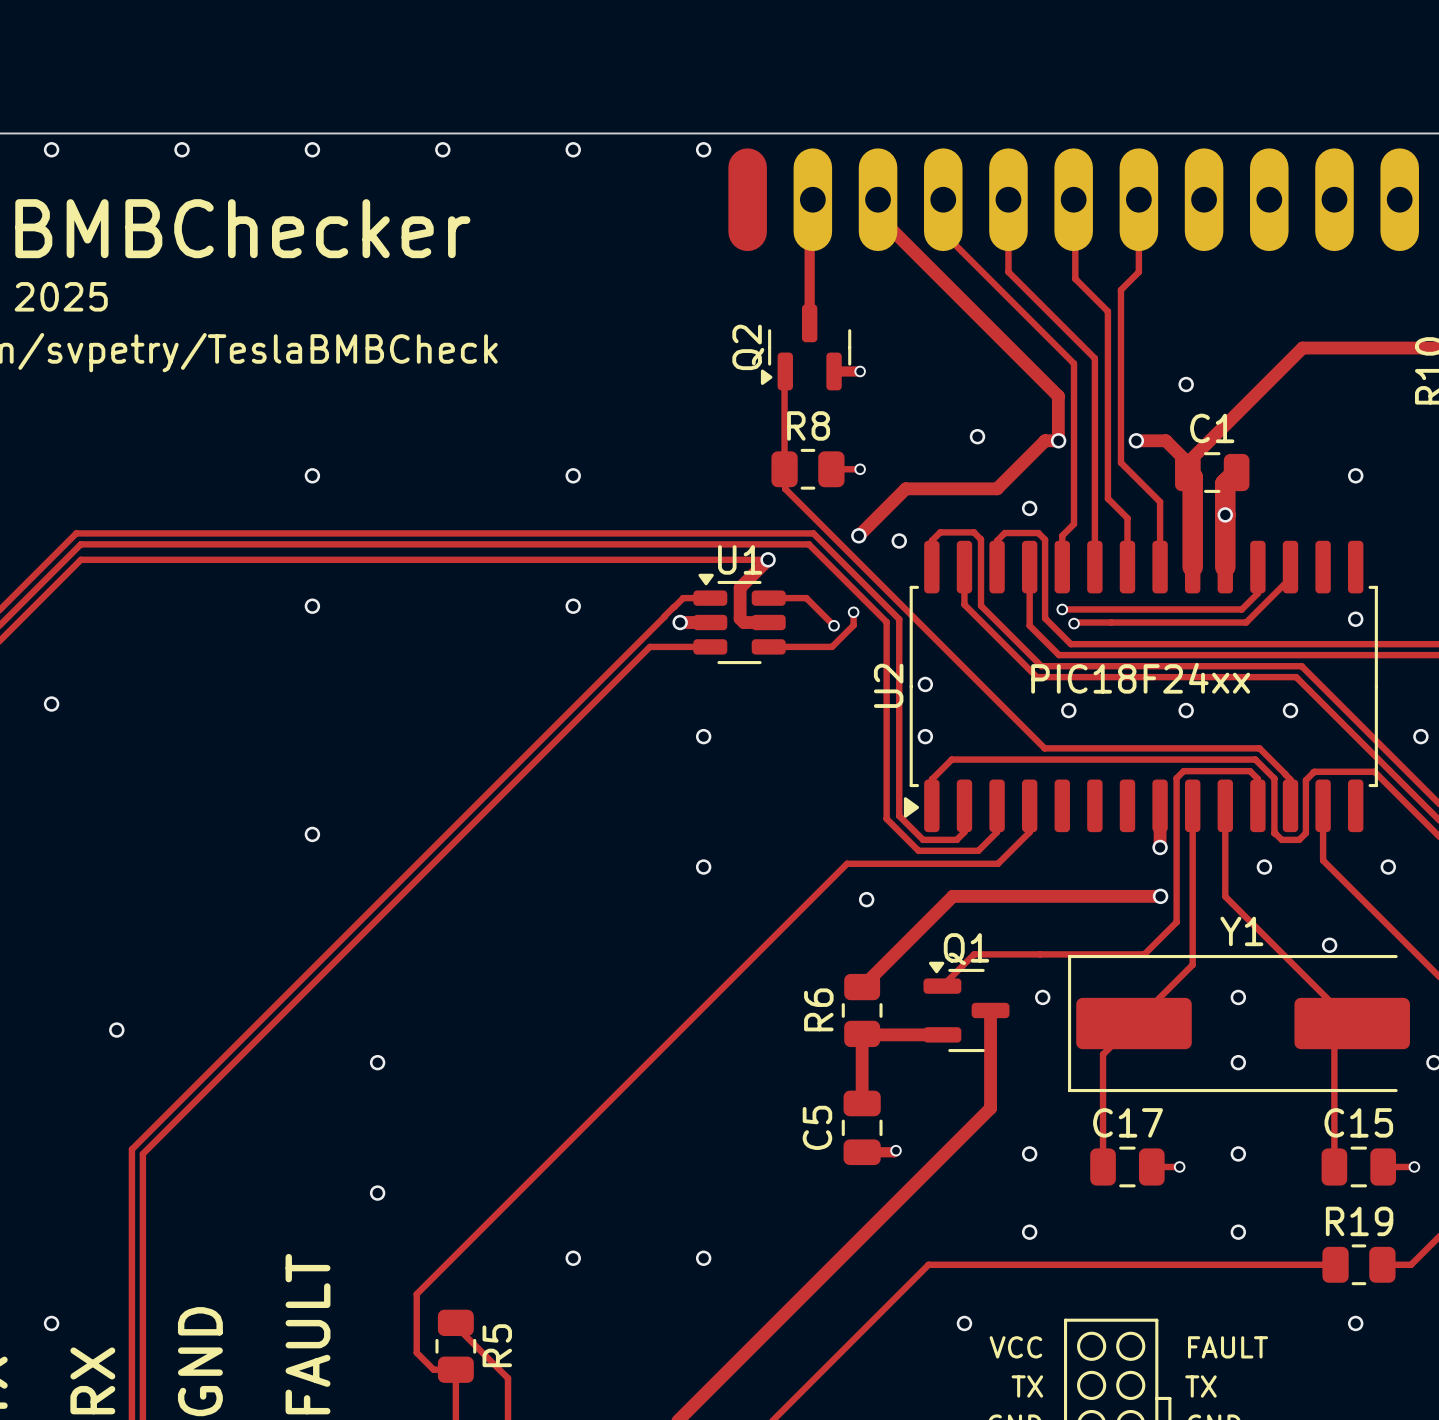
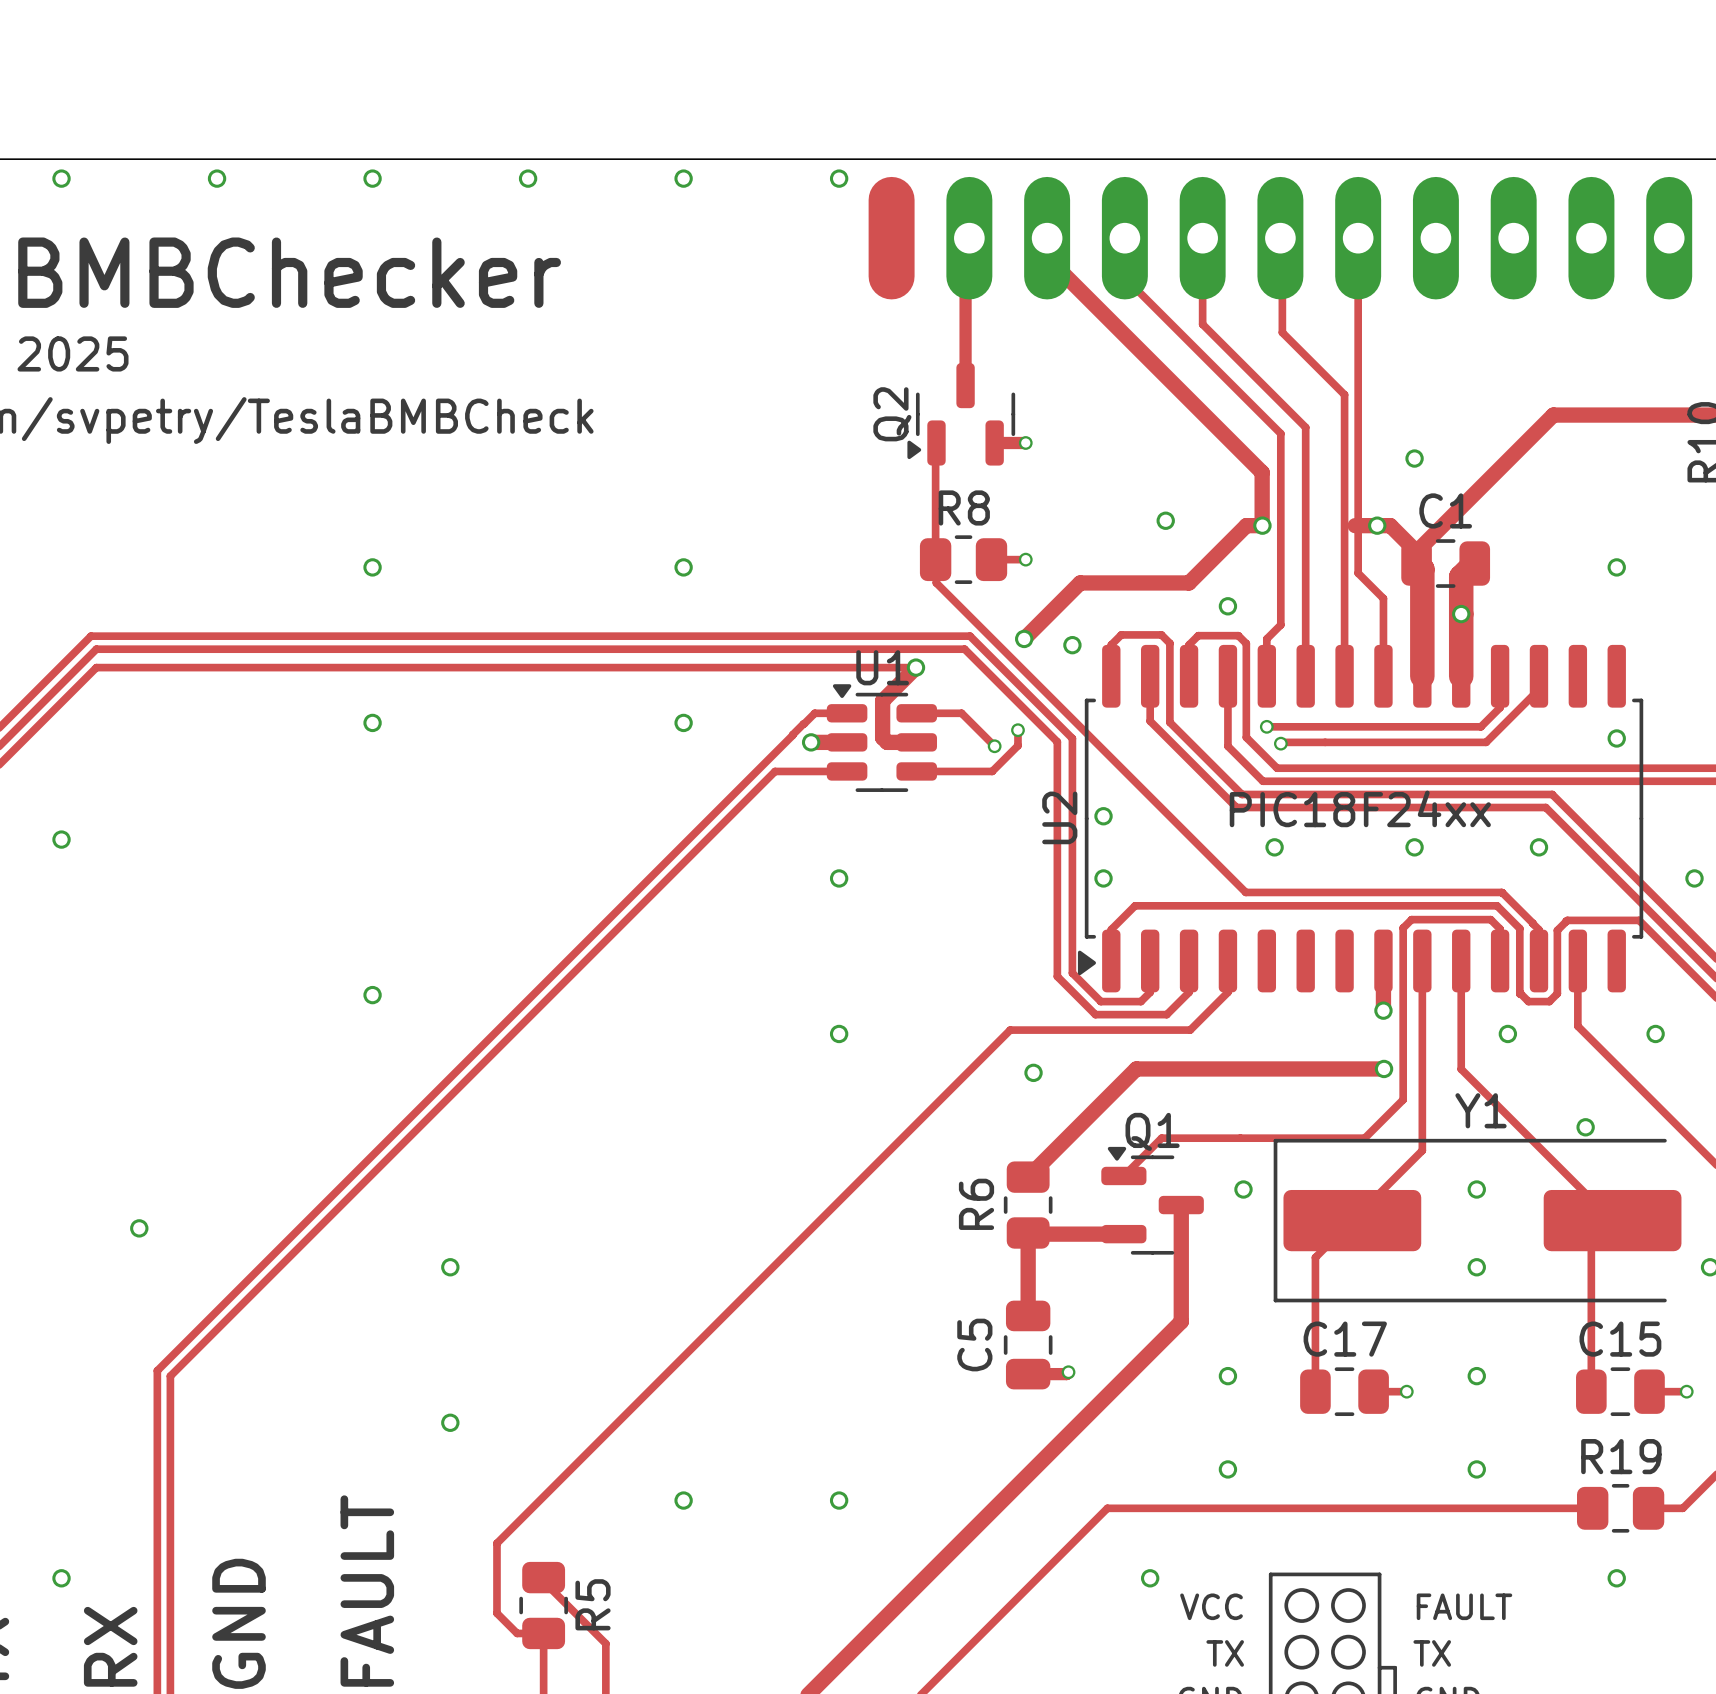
track: (1138, 272) (1120, 289) (1120, 462) (1138, 480) -> (1358, 324) (1358, 573)
track: (1107, 311) (1107, 498) (1127, 518) -> (1321, 371) (1344, 394) (1344, 617)
via position: (1136, 440) -> (1377, 525)

